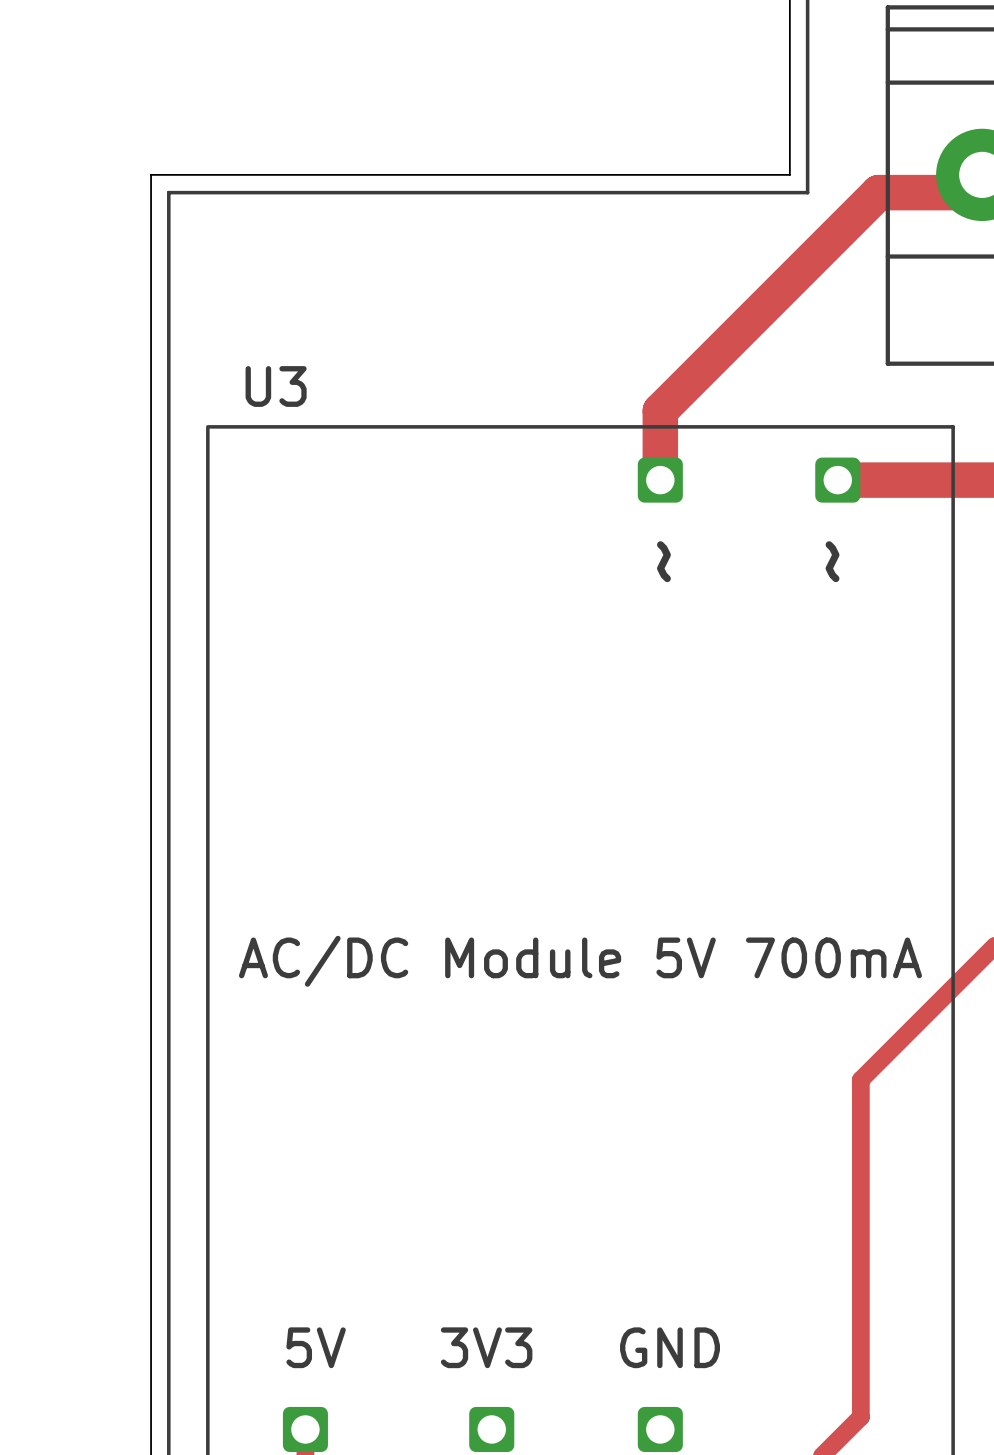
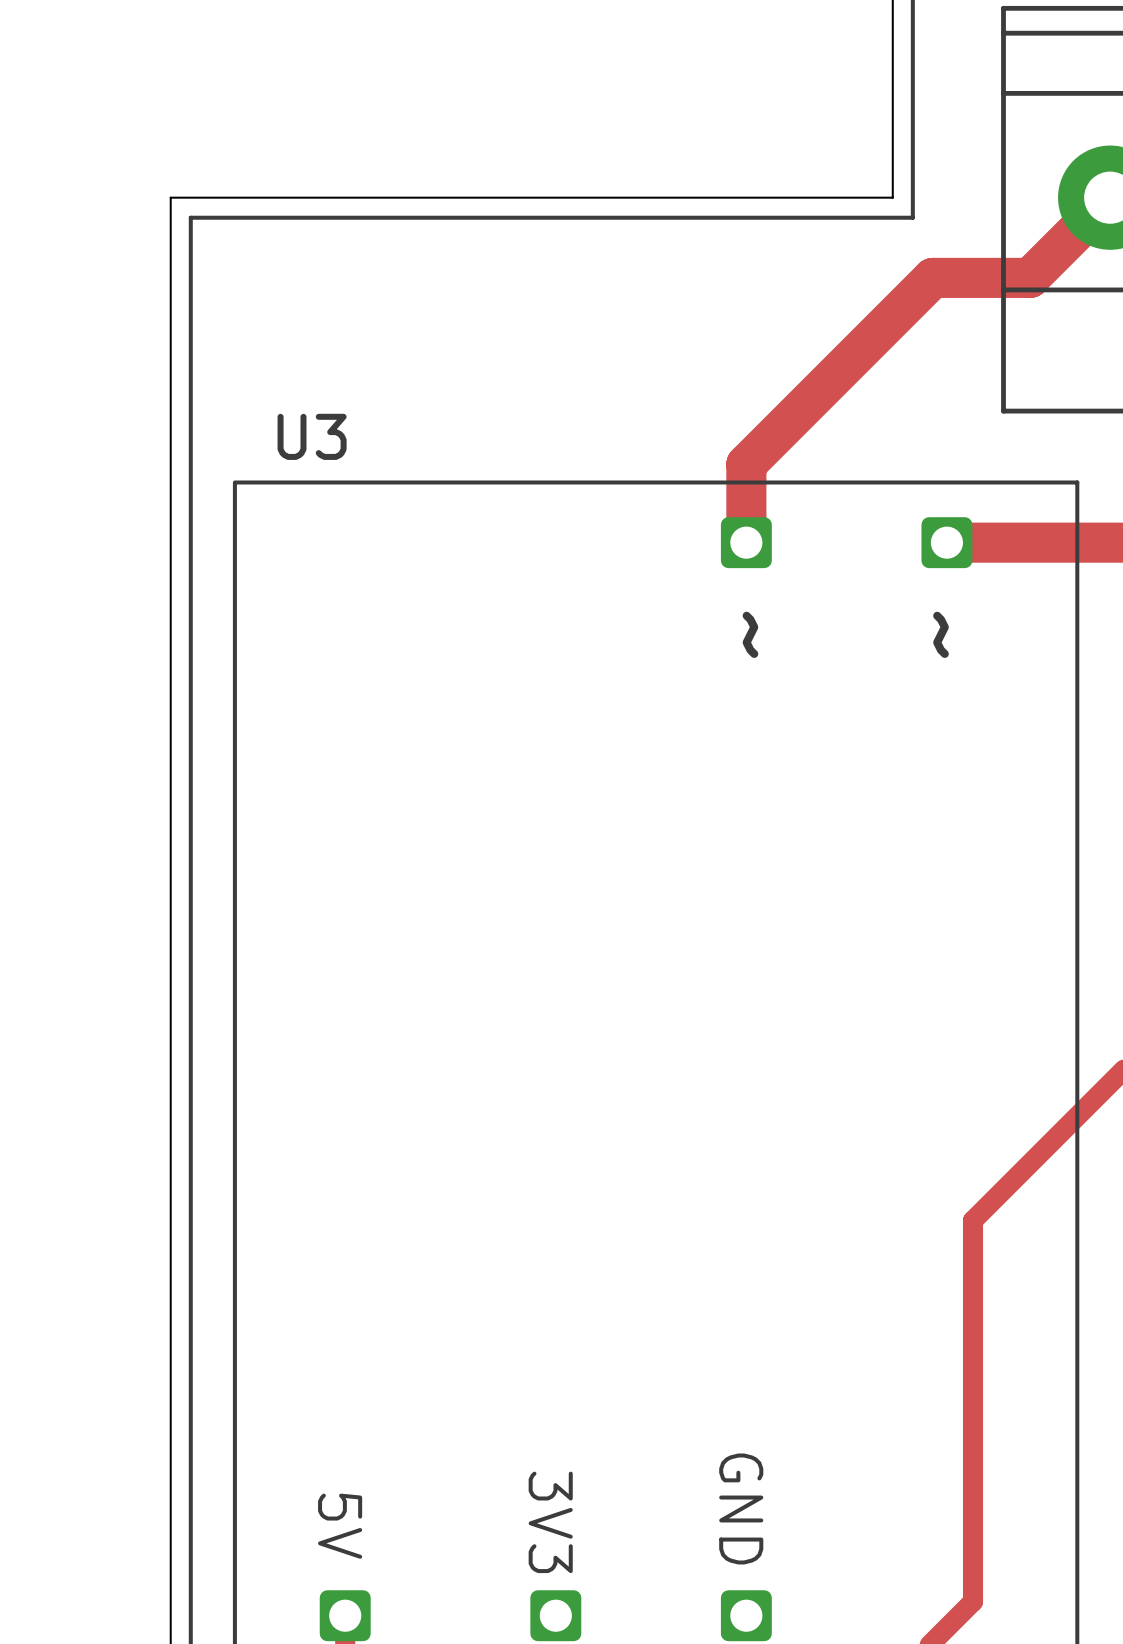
track: (964, 192) (878, 192) (825, 245) -> (1090, 217) (1029, 277) (932, 277)
U3 value: AC/DC Module 5V 700mA (580, 961) -> none
U3 text rotation: 0° (316, 1347) -> 90° clockwise (340, 1526)
U3 text rotation: 0° (486, 1347) -> 90° clockwise (550, 1522)
U3 text rotation: 0° (670, 1347) -> 90° clockwise (741, 1508)

